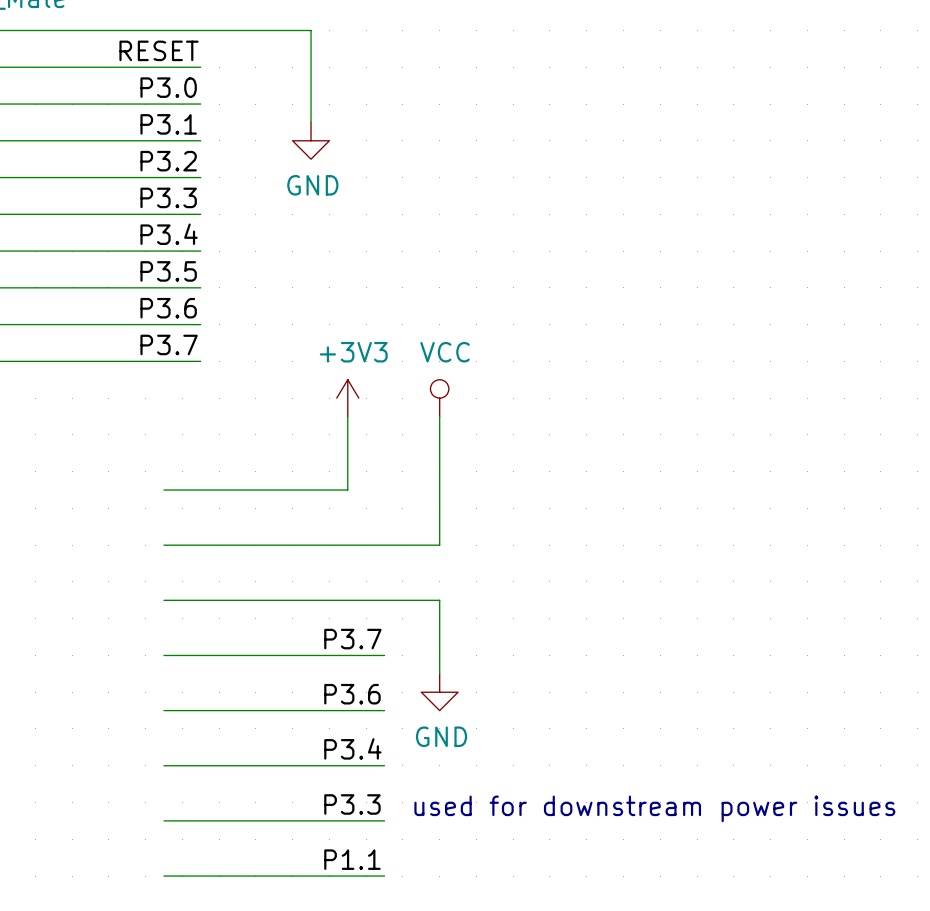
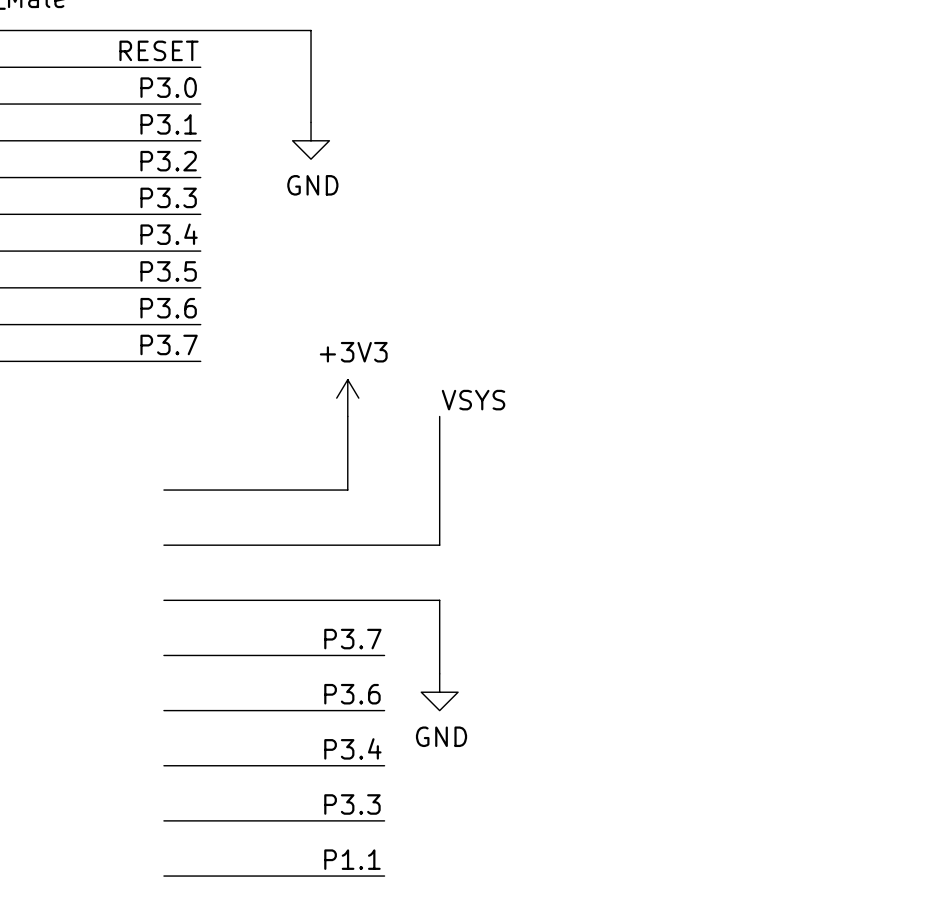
power symbol: VCC (439, 398) -> none
label: none -> VSYS (473, 400)
text: used for downstream power issues (654, 808) -> none

